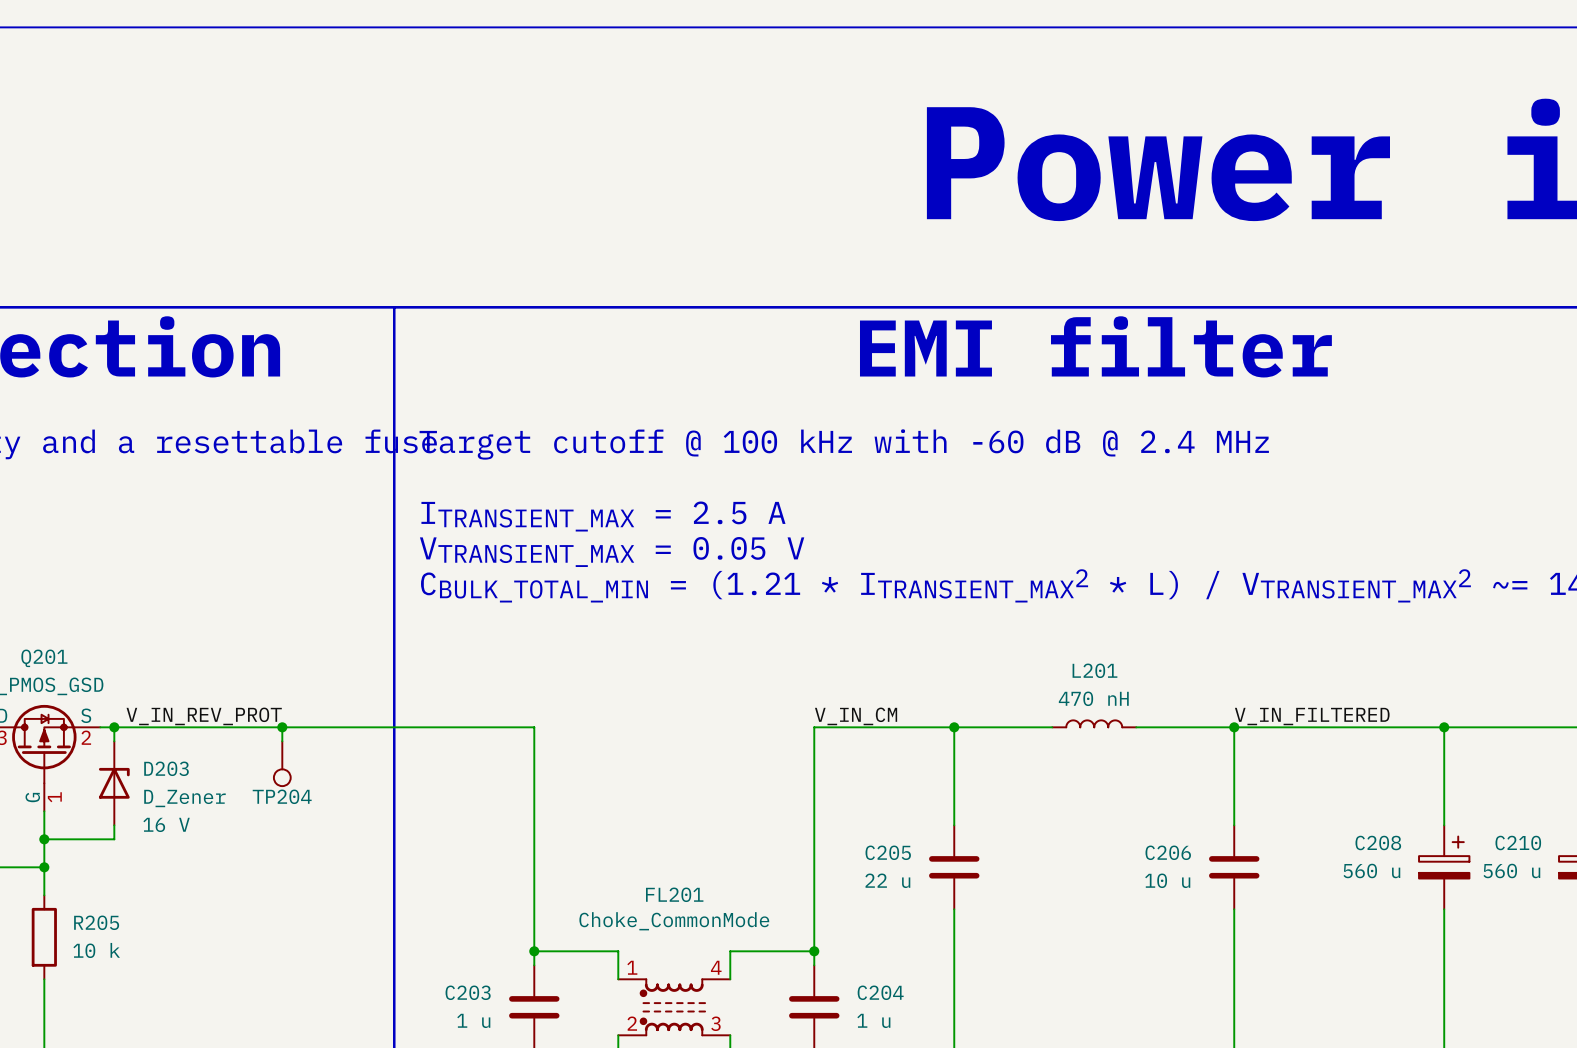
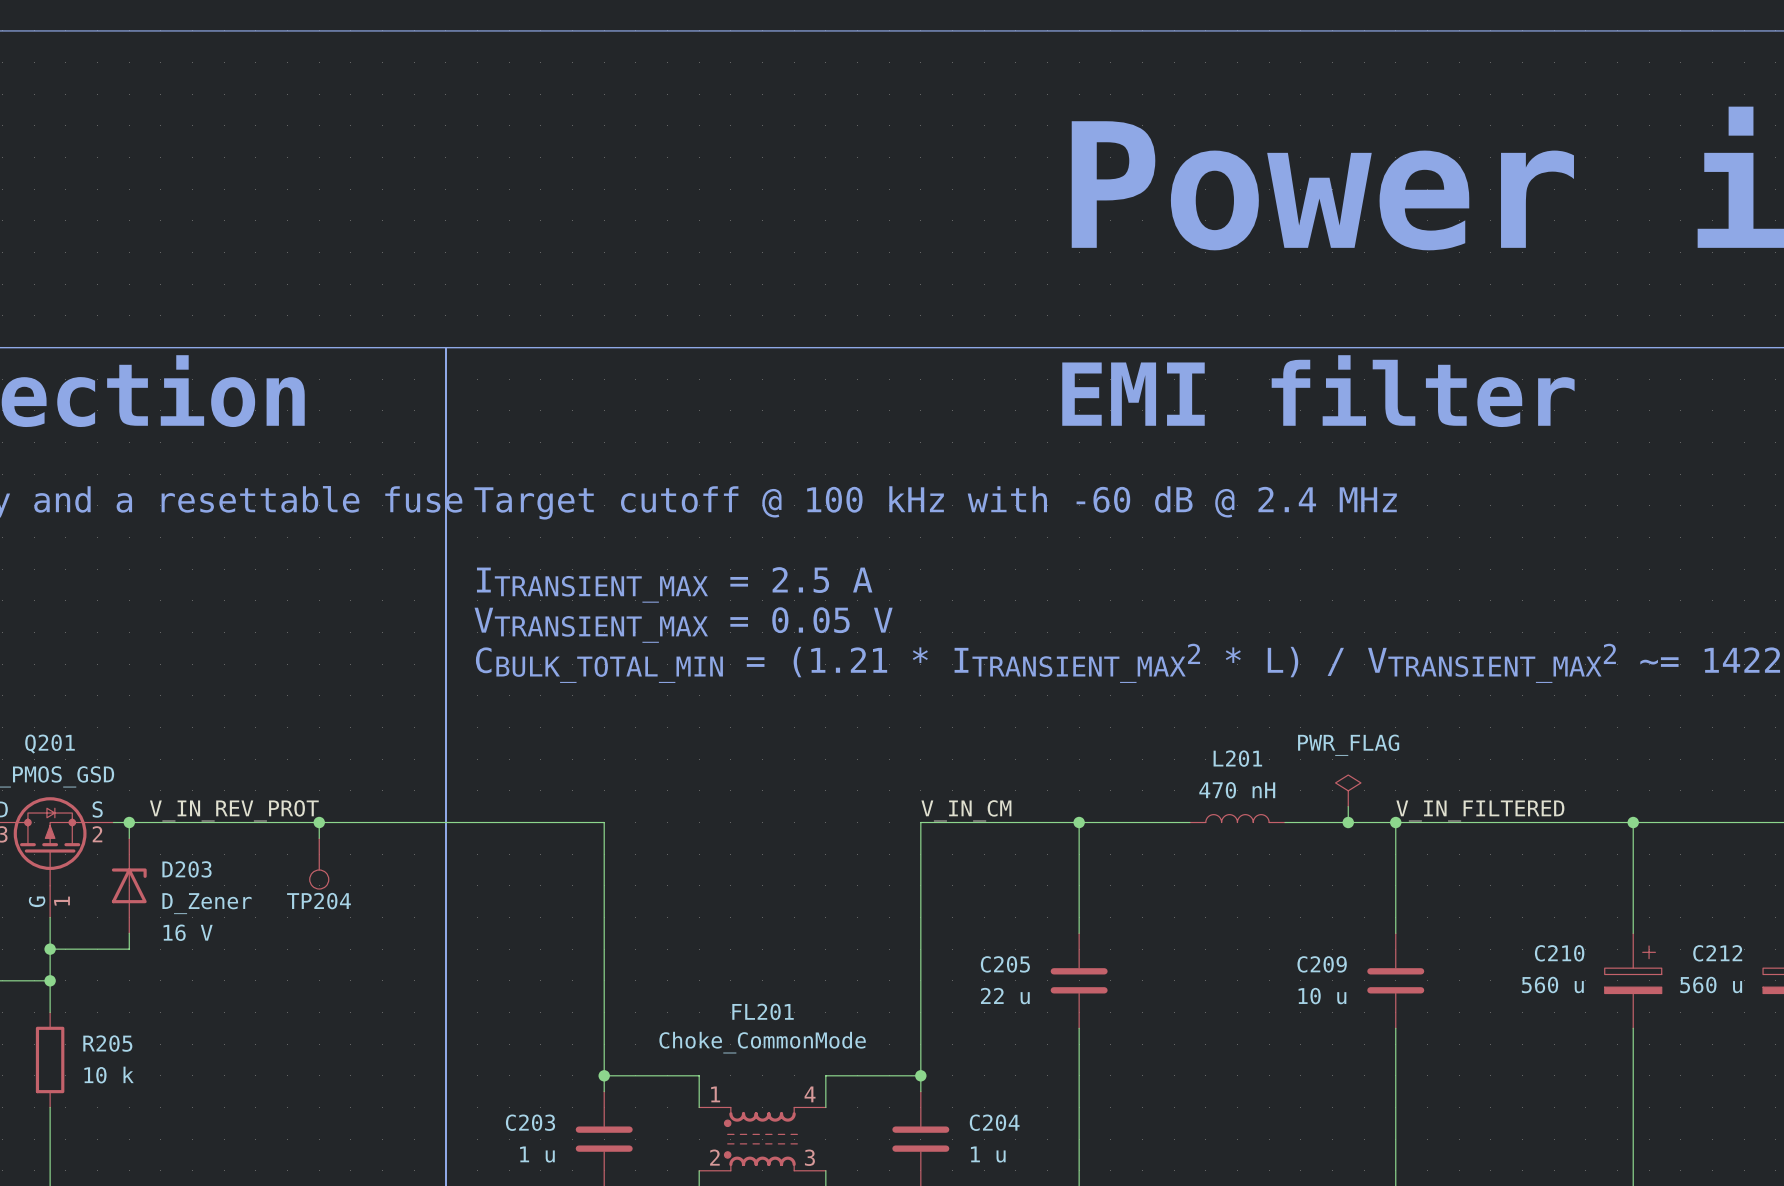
text position: EMI filter (1095, 346) -> EMI filter (1318, 391)
power symbol: none -> PWR_FLAG (1348, 790)
wire: none -> (1348, 806) (1348, 822)
junction: none -> (1348, 822)
C208 name: C208 (1378, 842) -> C210 (1559, 953)
C210 name: C210 (1518, 842) -> C212 (1717, 953)
C206 name: C206 (1168, 852) -> C209 (1322, 964)

